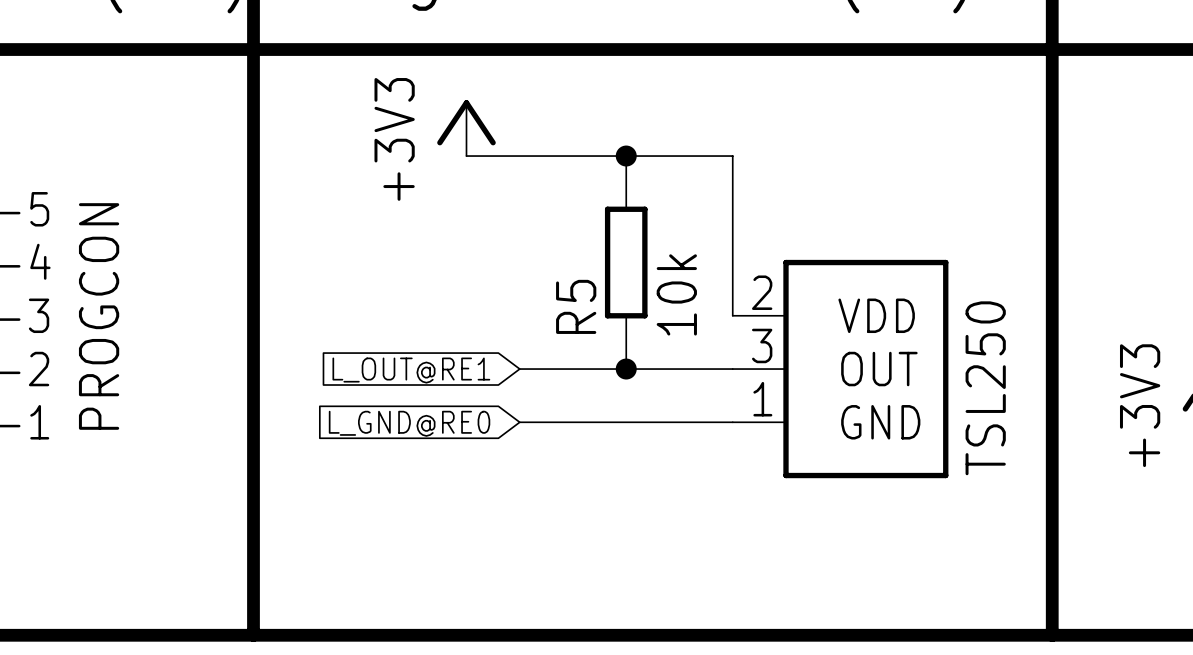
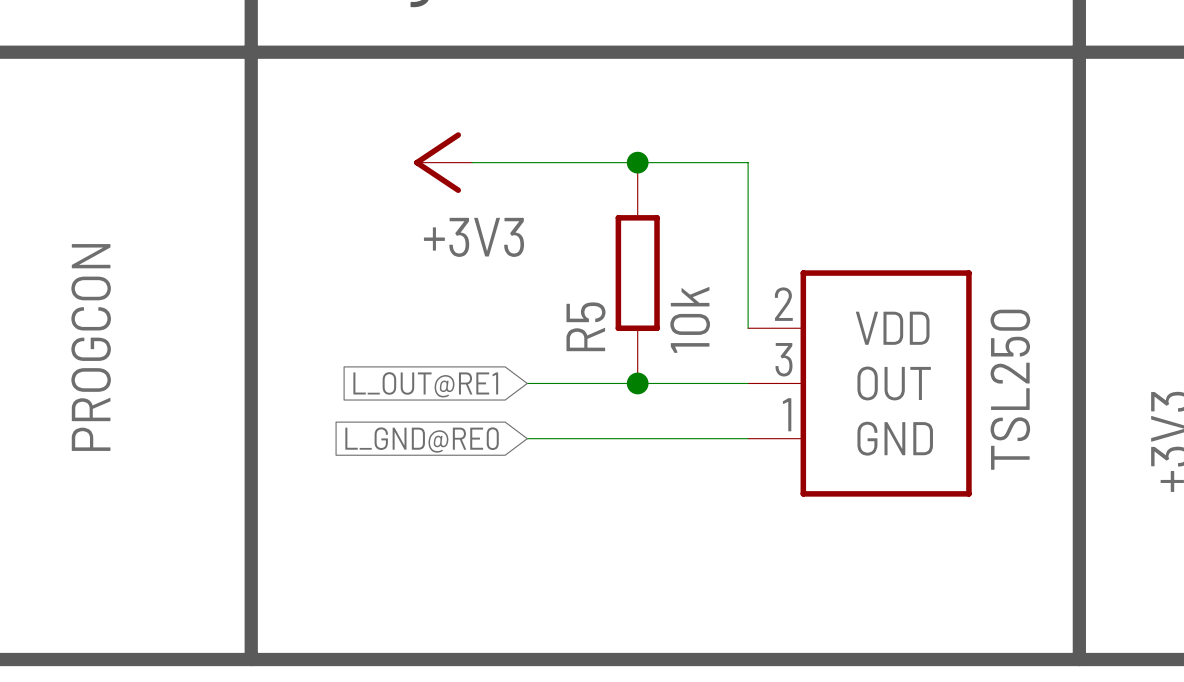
power symbol rotation: 0° (466, 122) -> 90° counterclockwise (437, 162)
power symbol position: +3V3 (466, 128) -> +3V3 (443, 162)

